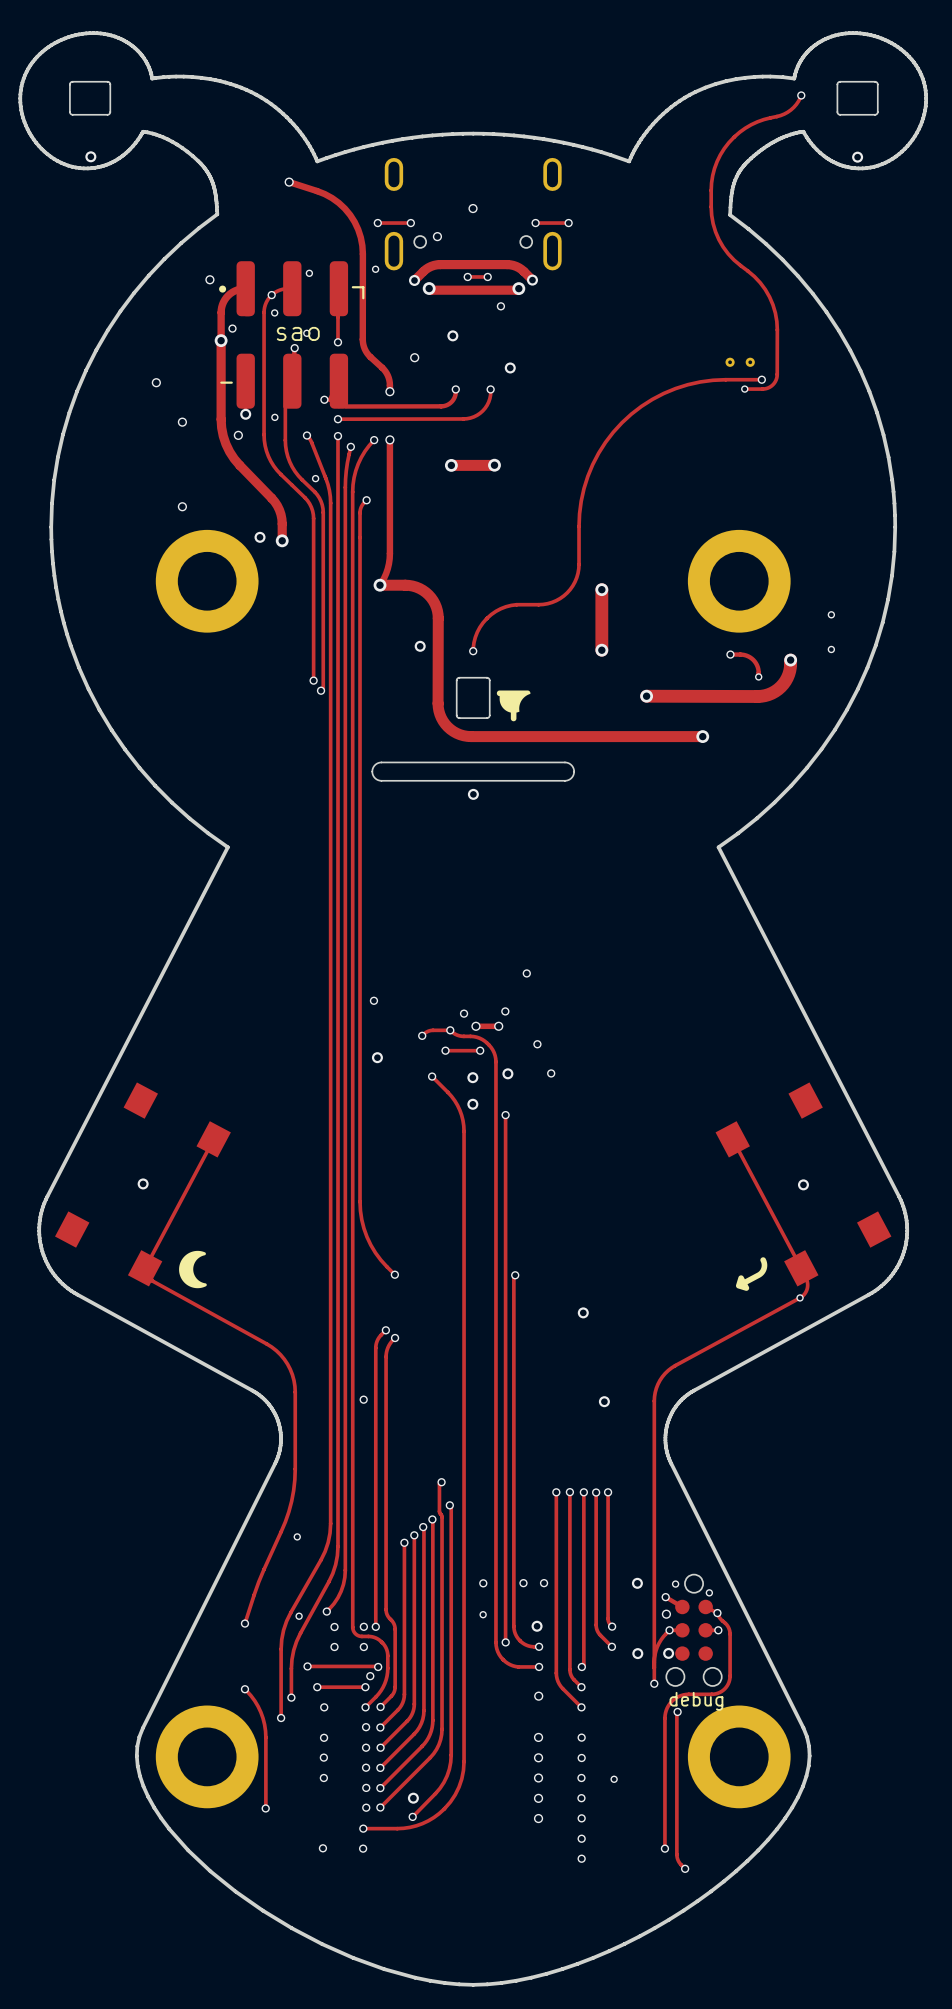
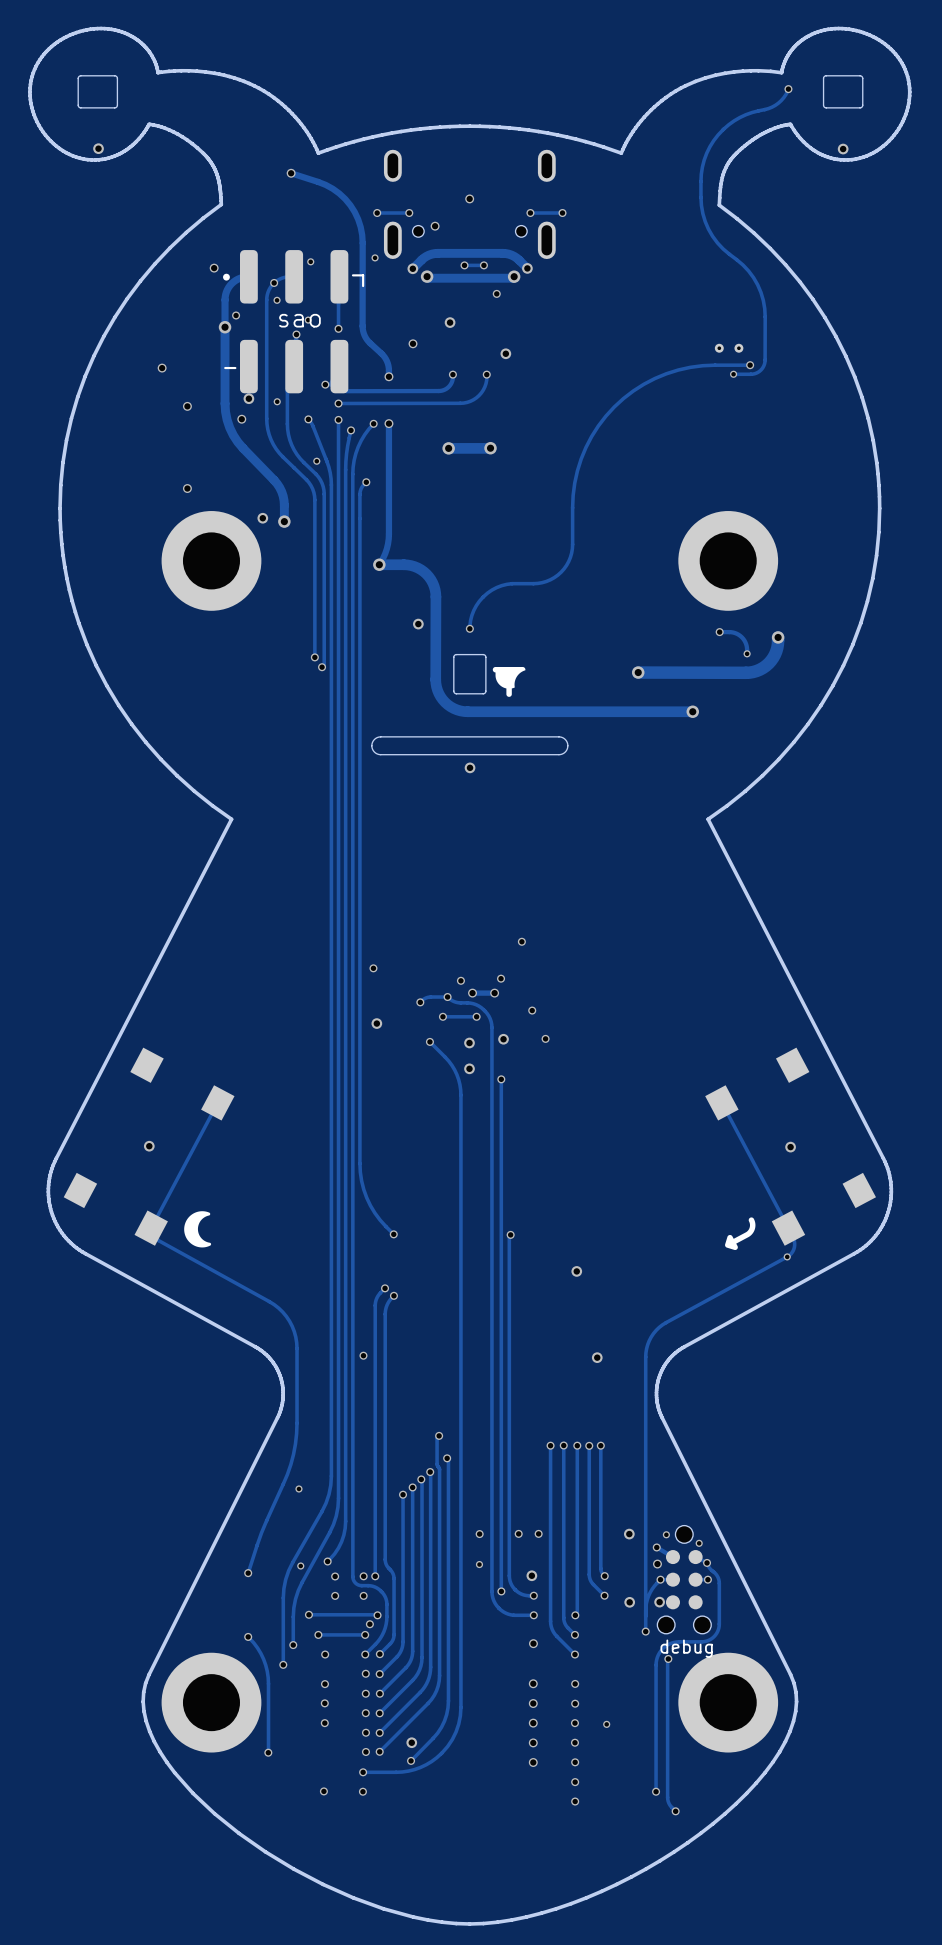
track: (601, 589) (601, 650) -> none
via: (601, 589) -> none
via: (831, 614) -> none
via: (831, 649) -> none
via: (601, 650) -> none

